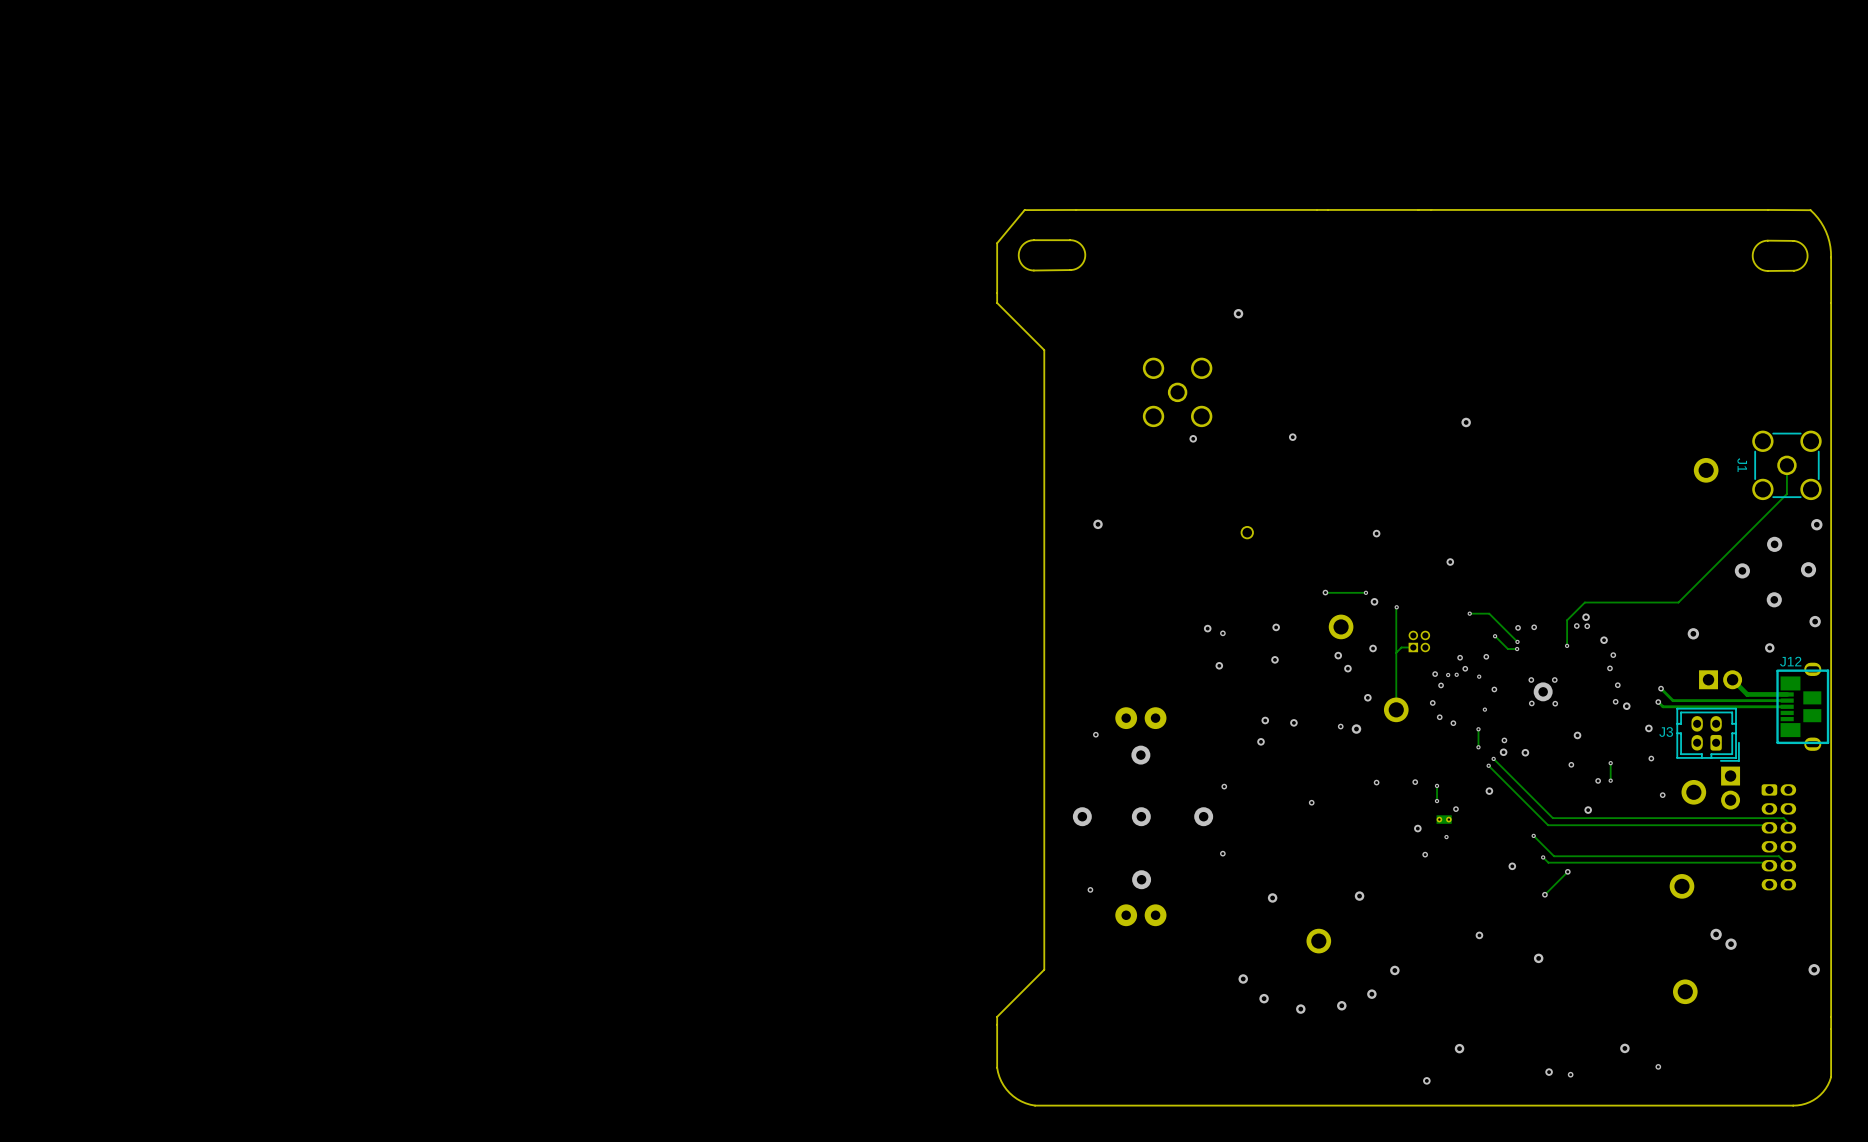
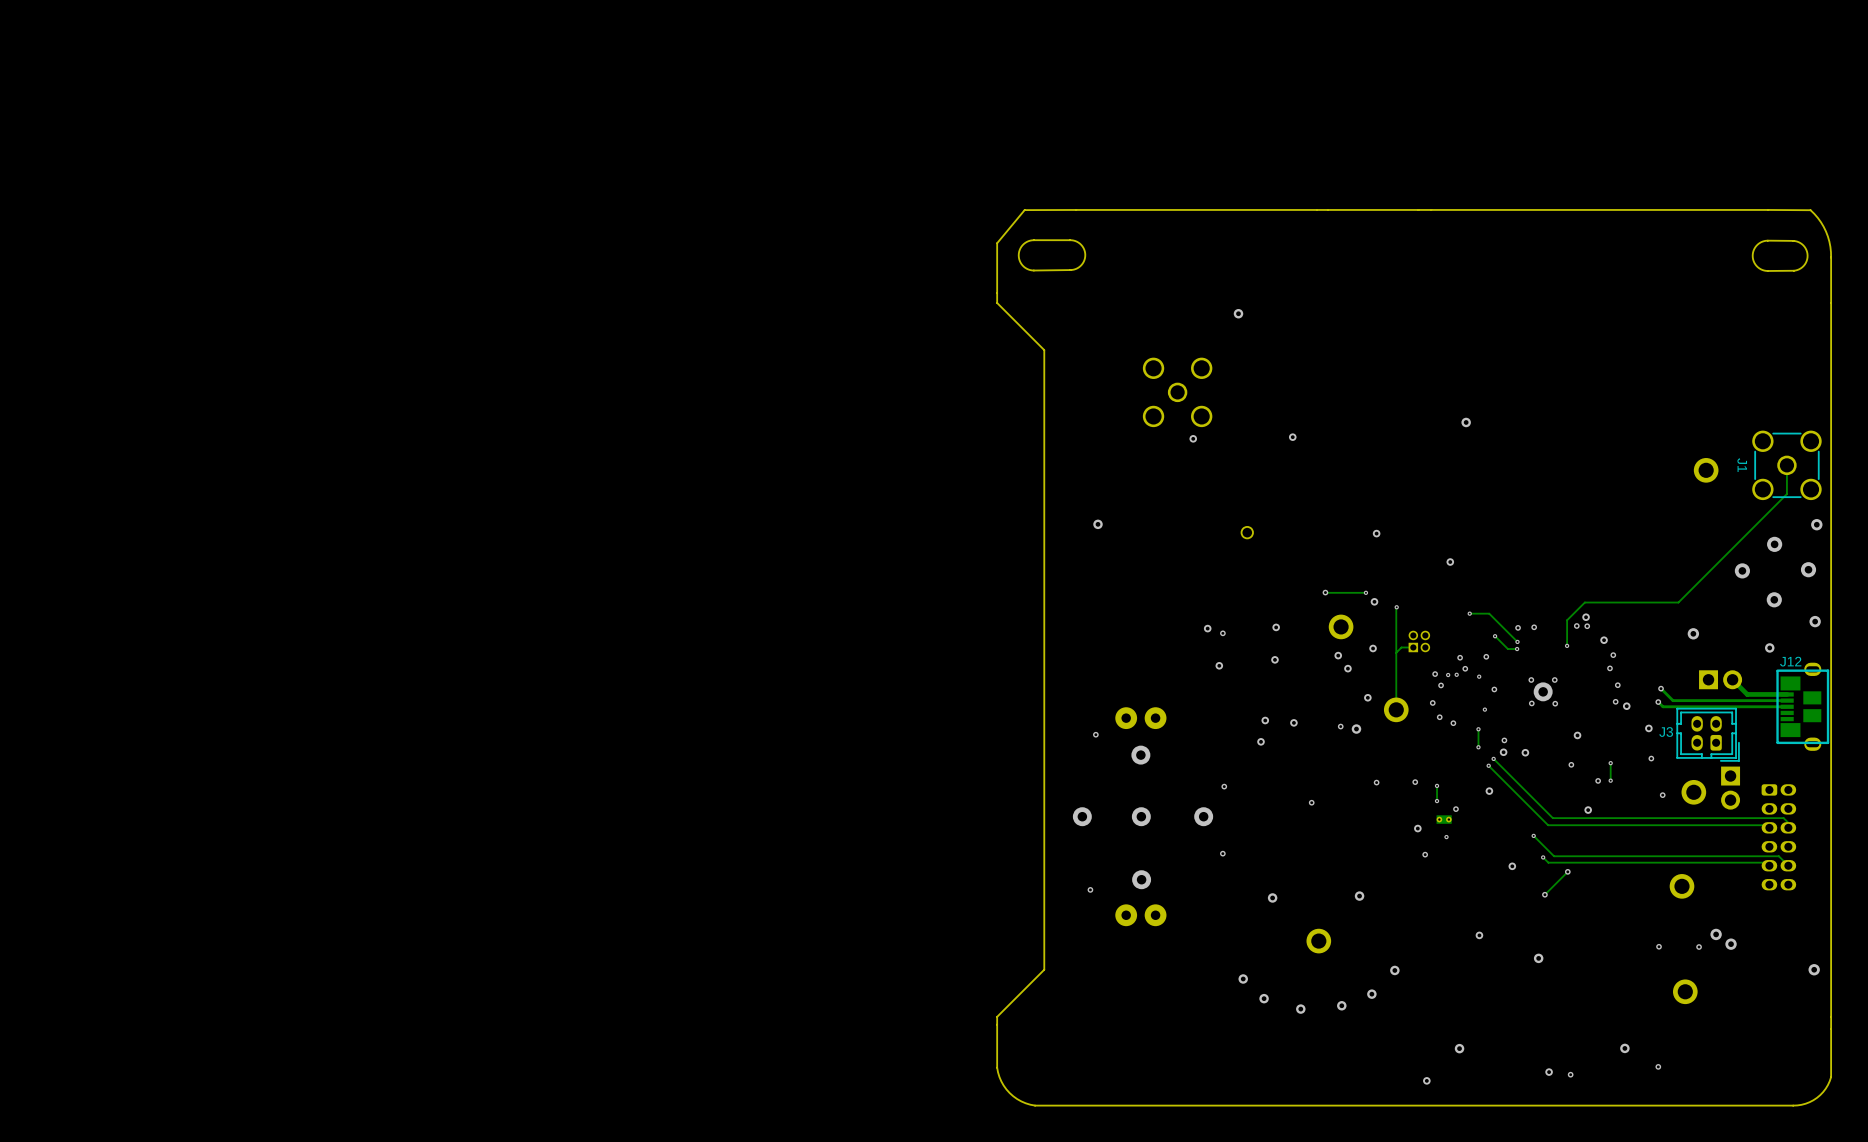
via: none -> (1659, 946)
via: none -> (1699, 947)

